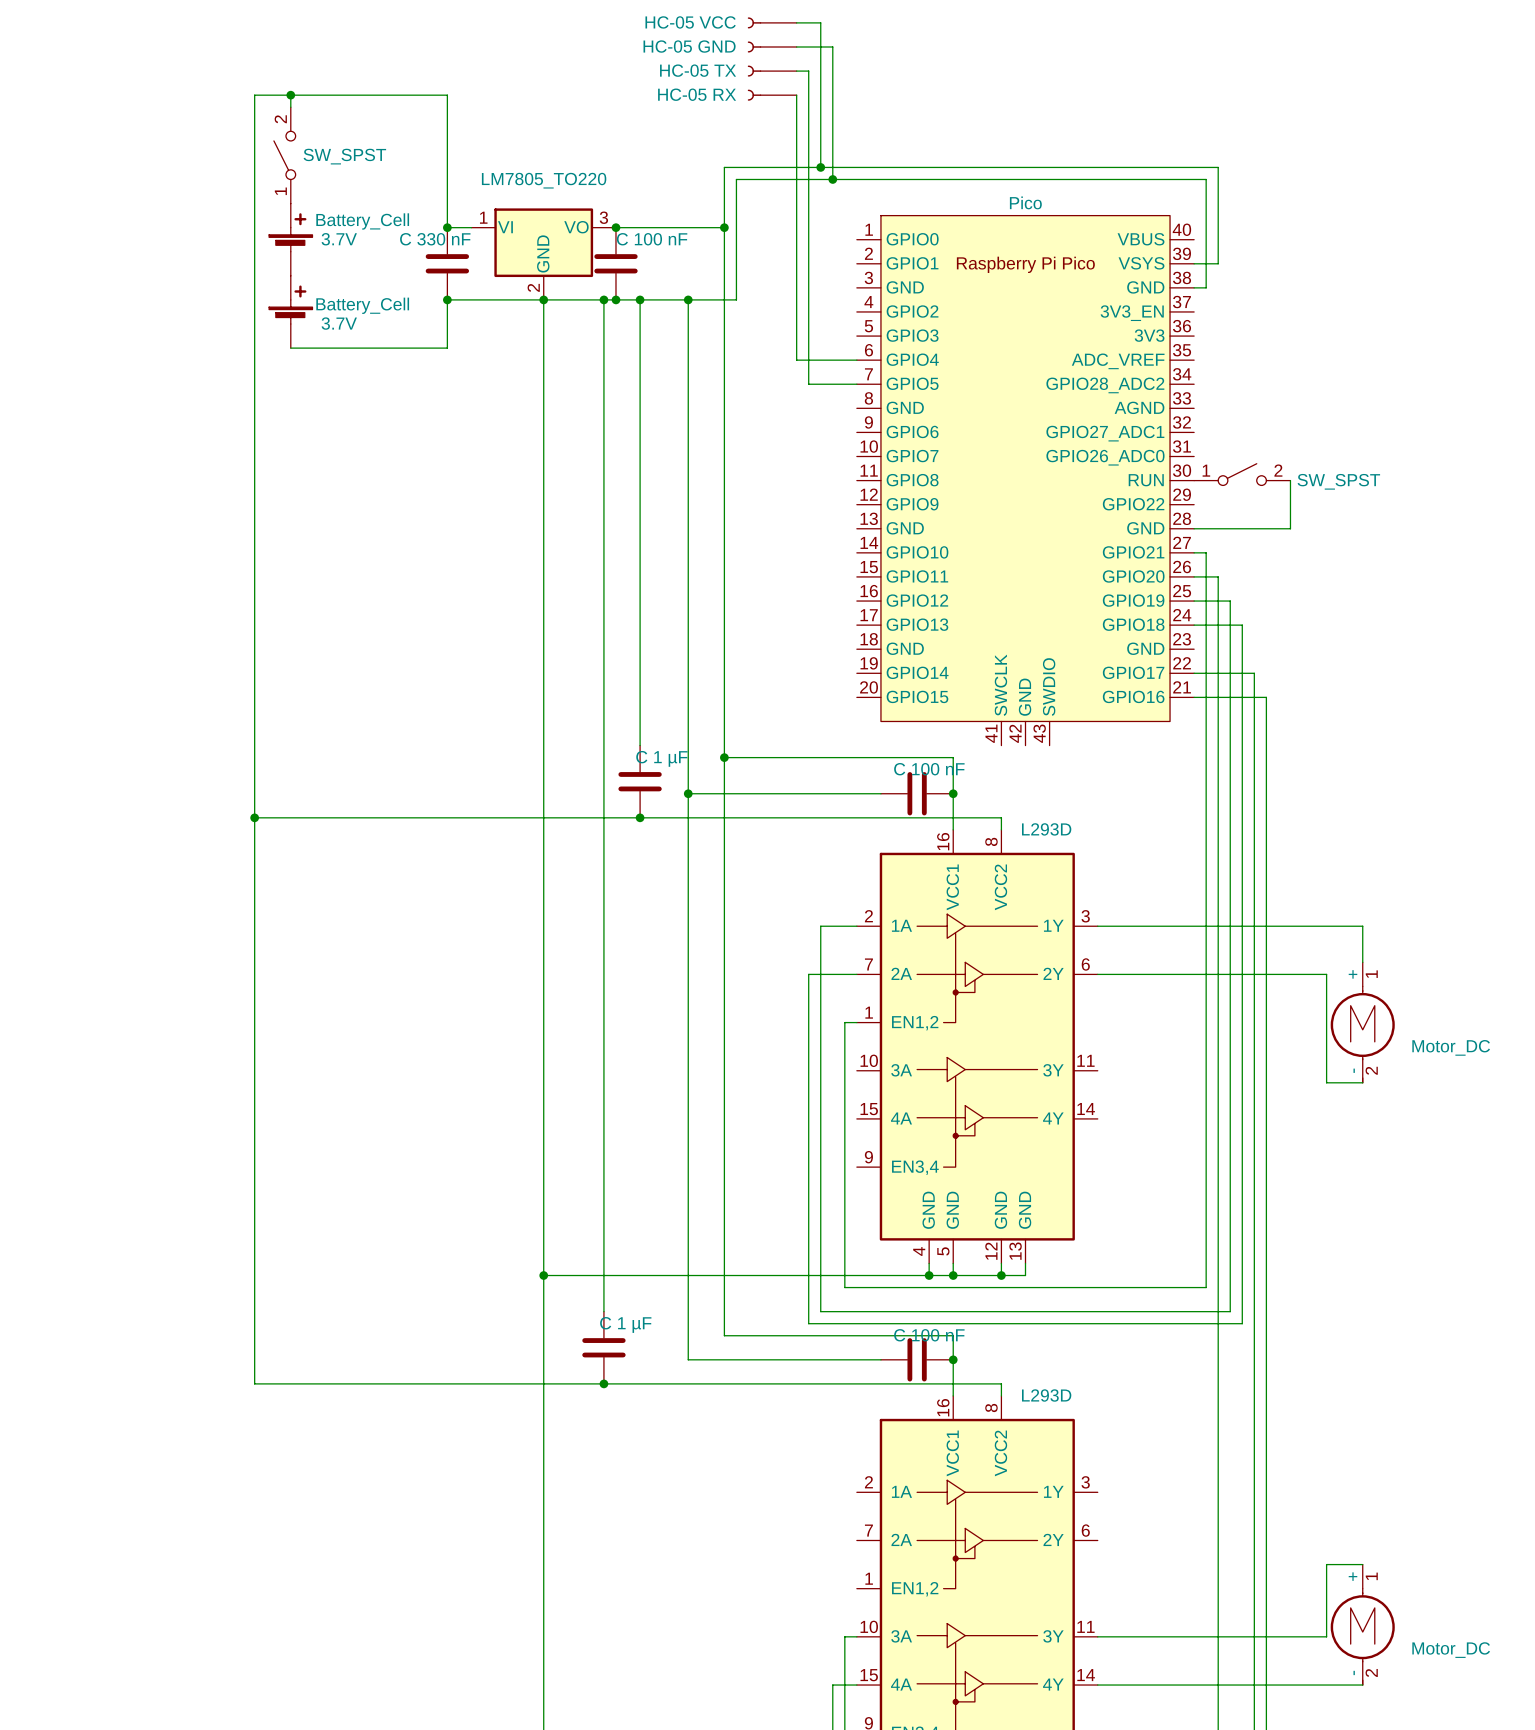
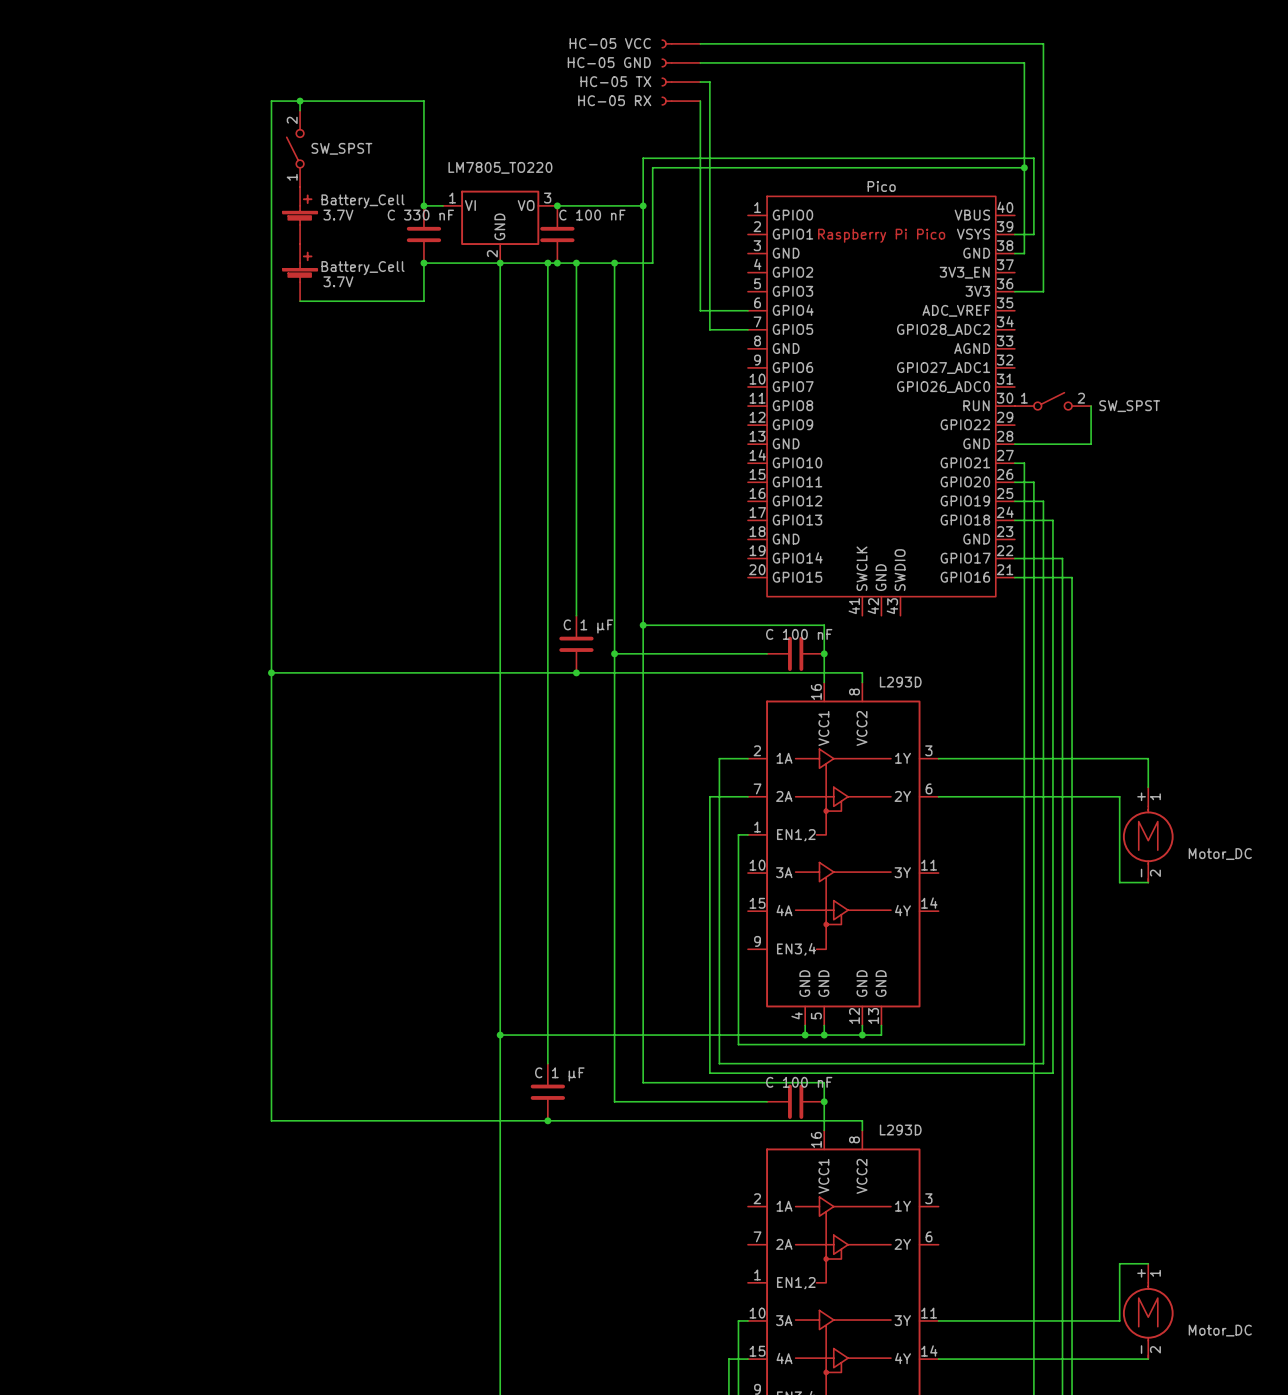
wire: (820, 22) (820, 167) -> (719, 43) (1043, 43) (1043, 291) (1014, 291)
wire: (832, 46) (832, 179) -> (728, 62) (1024, 62) (1024, 167)
junction: (820, 167) -> none
junction: (832, 179) -> none
junction: none -> (1024, 167)

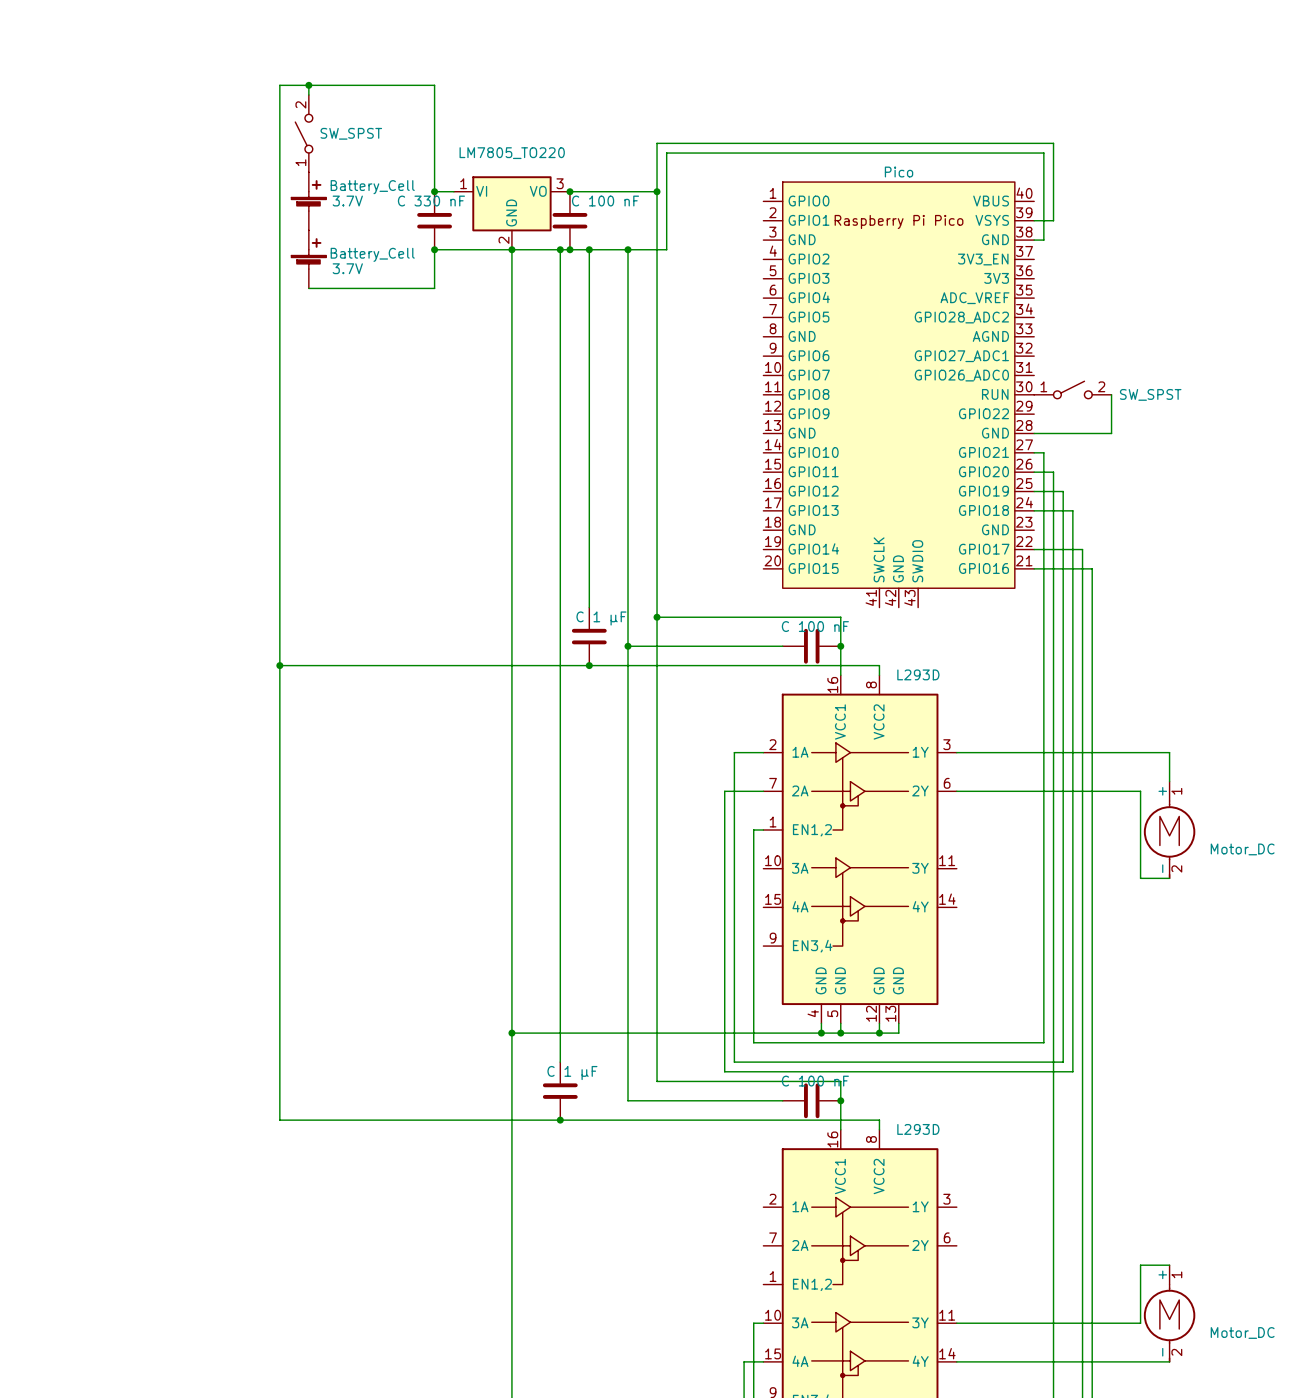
part: HC-05 VCC (681, 43) -> none
wire: (700, 43) (1043, 43) (1043, 291) (1014, 291) -> none
part: HC-05 GND (681, 62) -> none
wire: (700, 62) (1024, 62) (1024, 167) -> none
part: HC-05 TX (681, 82) -> none
wire: (700, 82) (709, 82) (709, 329) (747, 329) -> none
part: HC-05 RX (681, 101) -> none
wire: (700, 101) (700, 310) (747, 310) -> none
junction: (1024, 167) -> none

